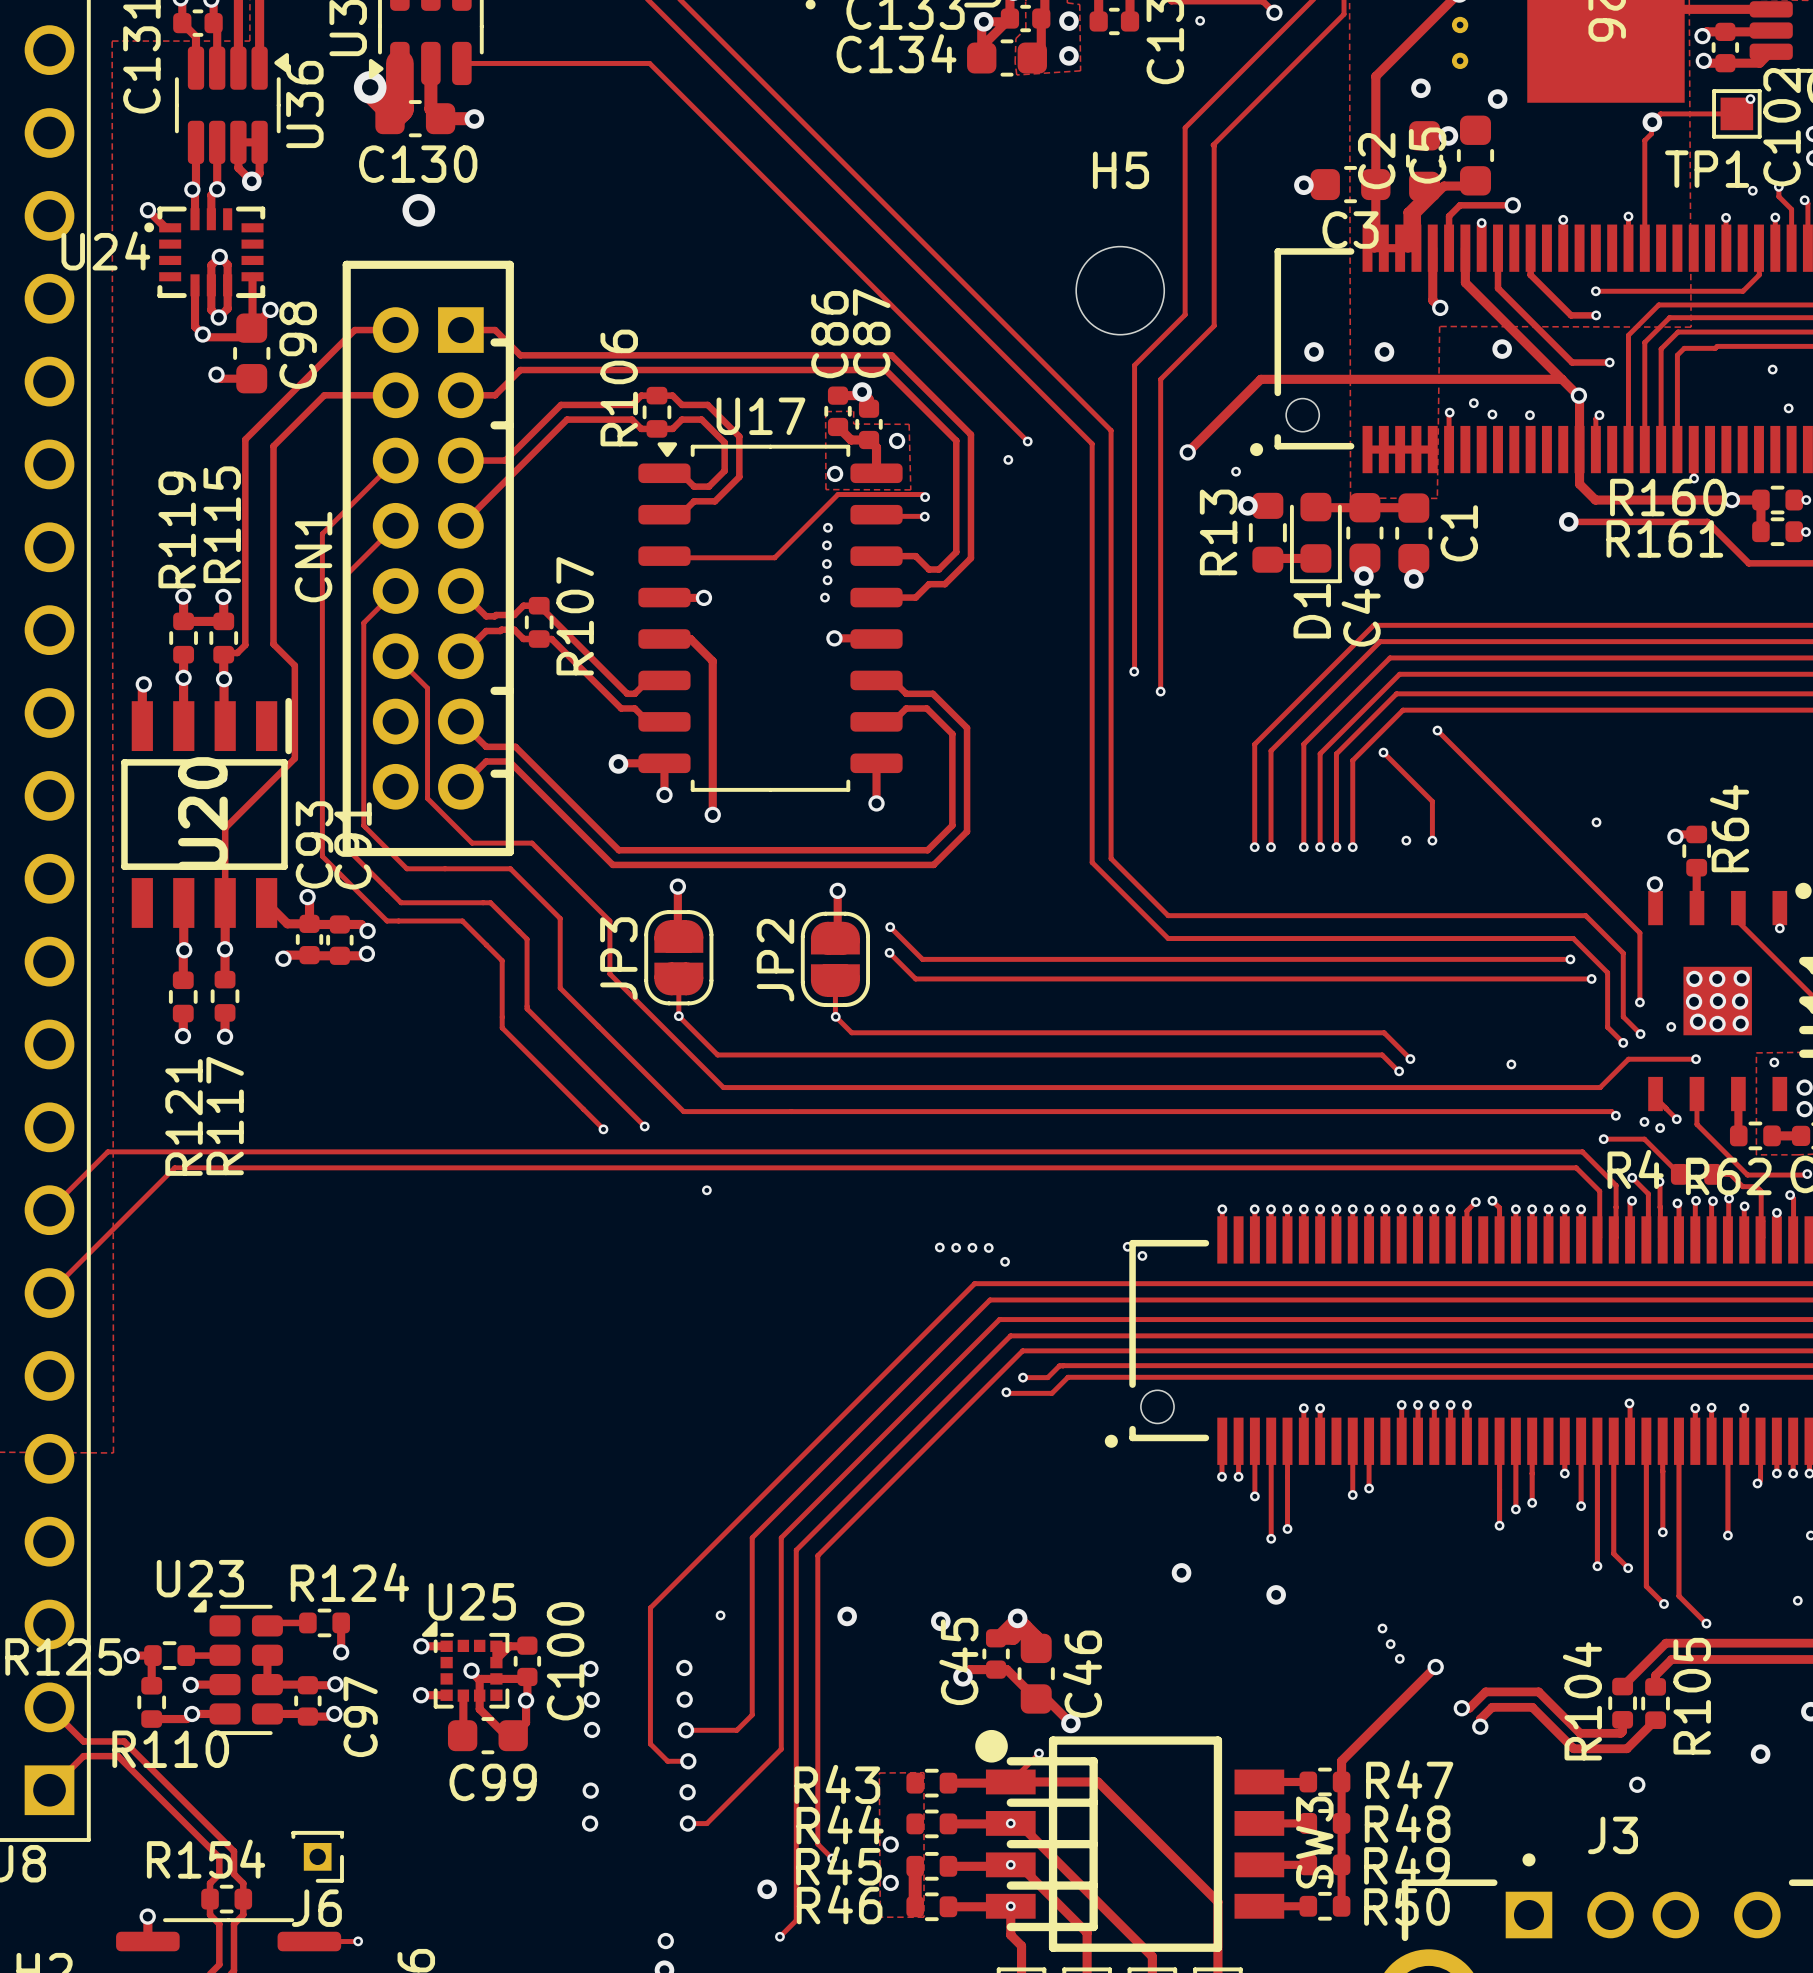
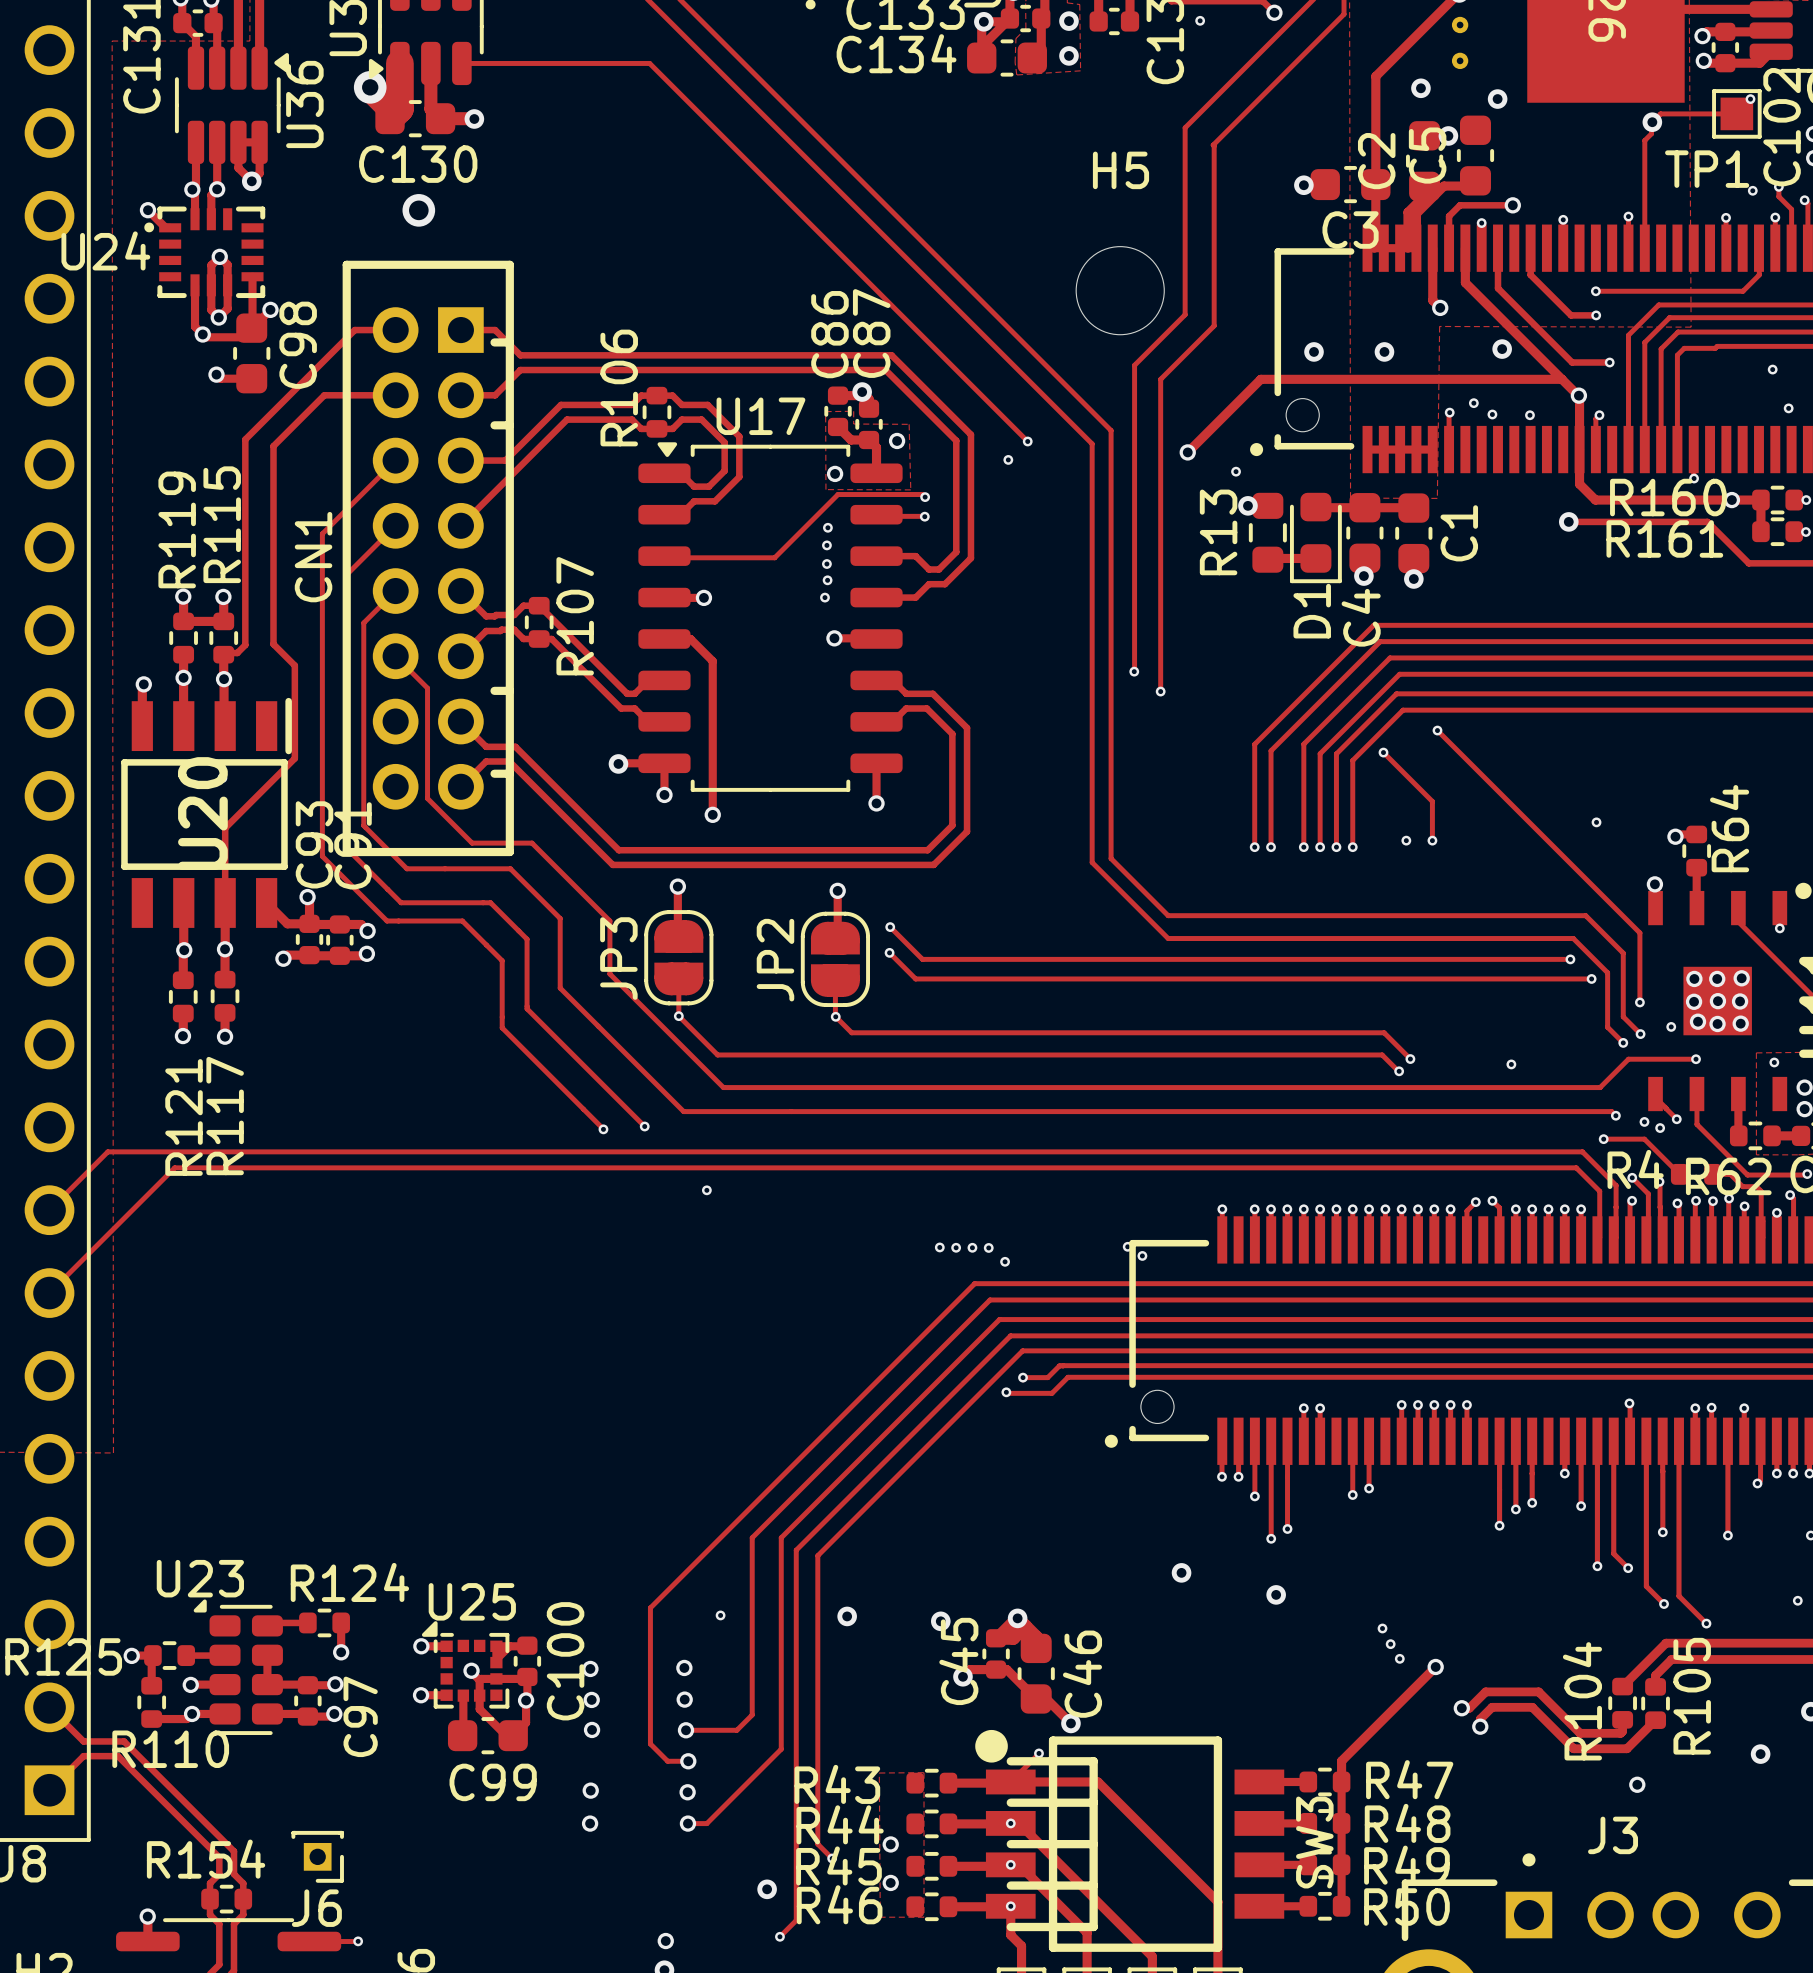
track: (915, 1866) (915, 1906) -> none

